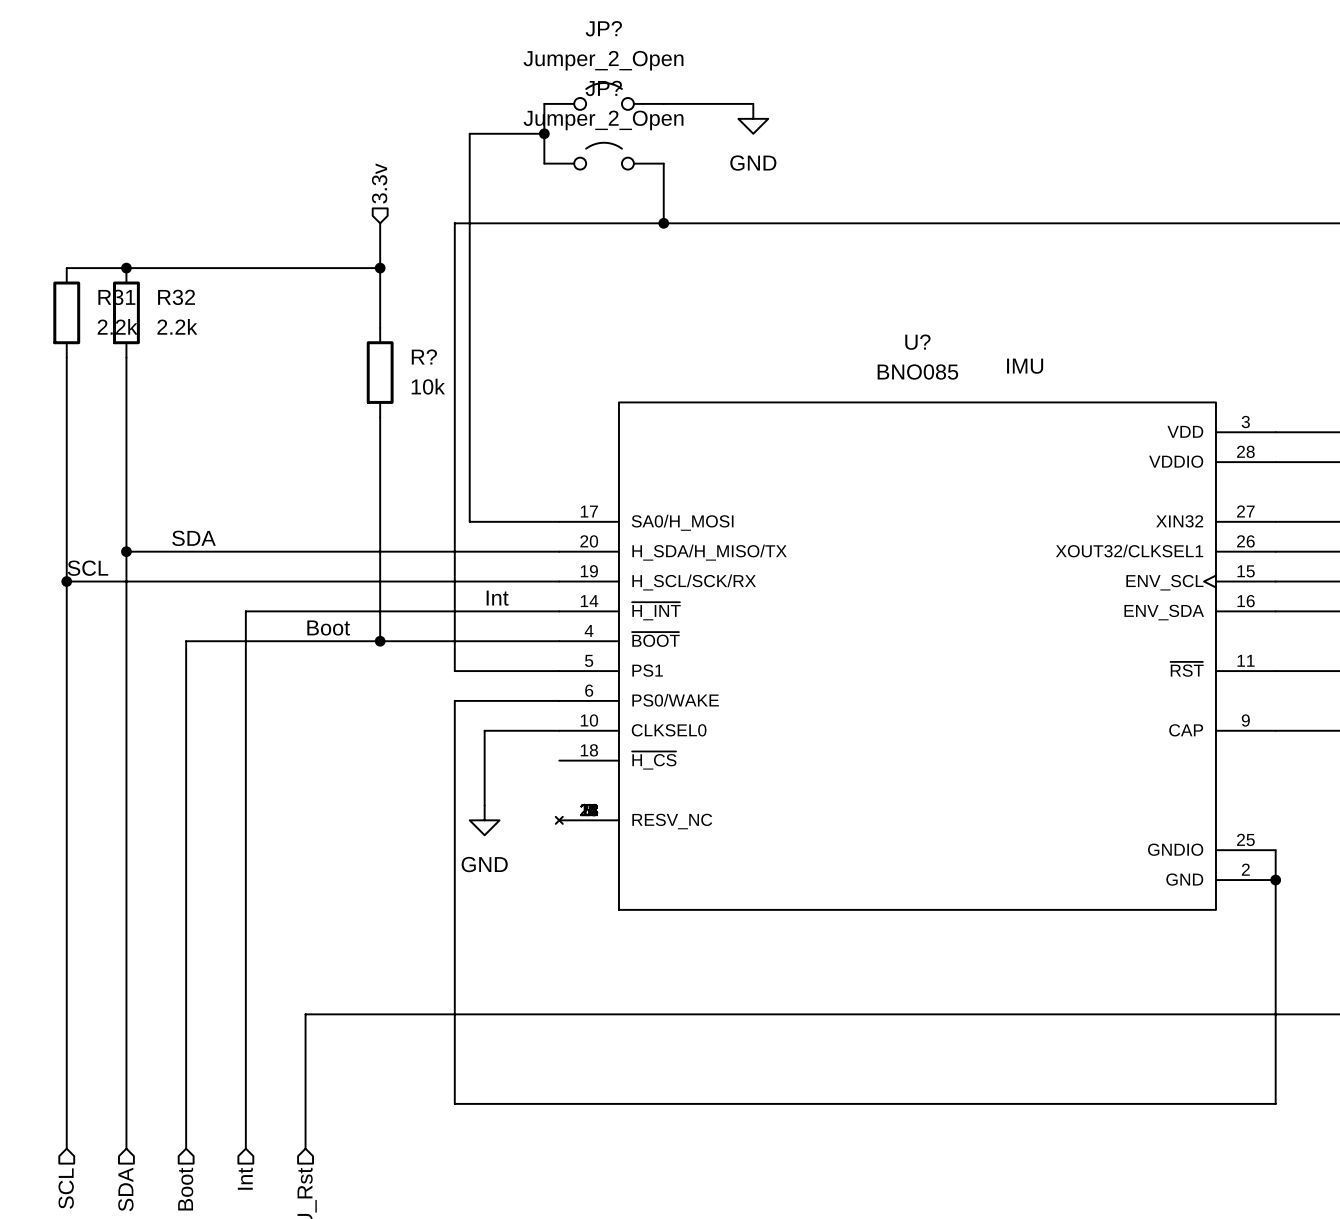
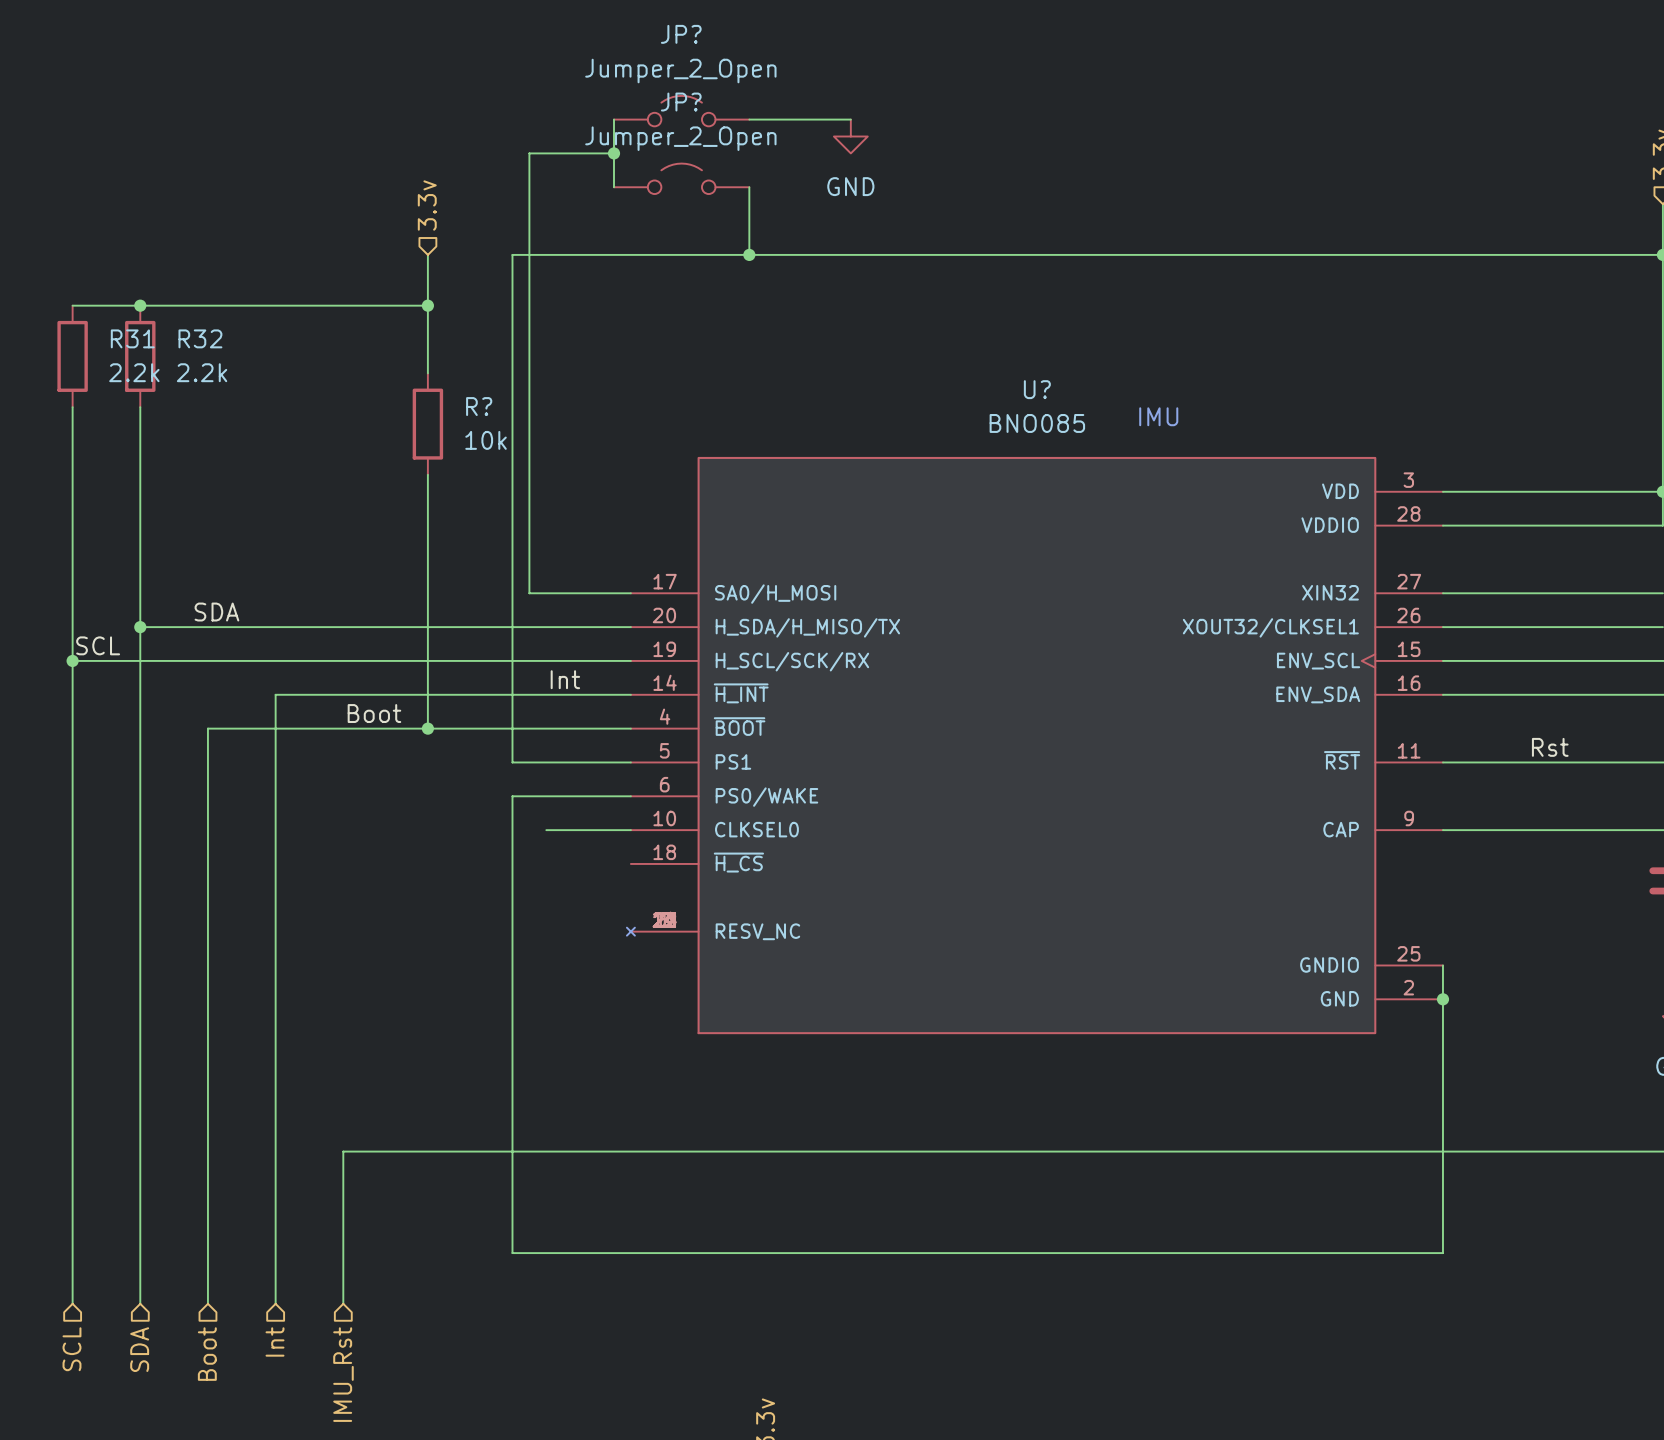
wire: (484, 730) (484, 805) -> none
power symbol: GND (484, 820) -> none

